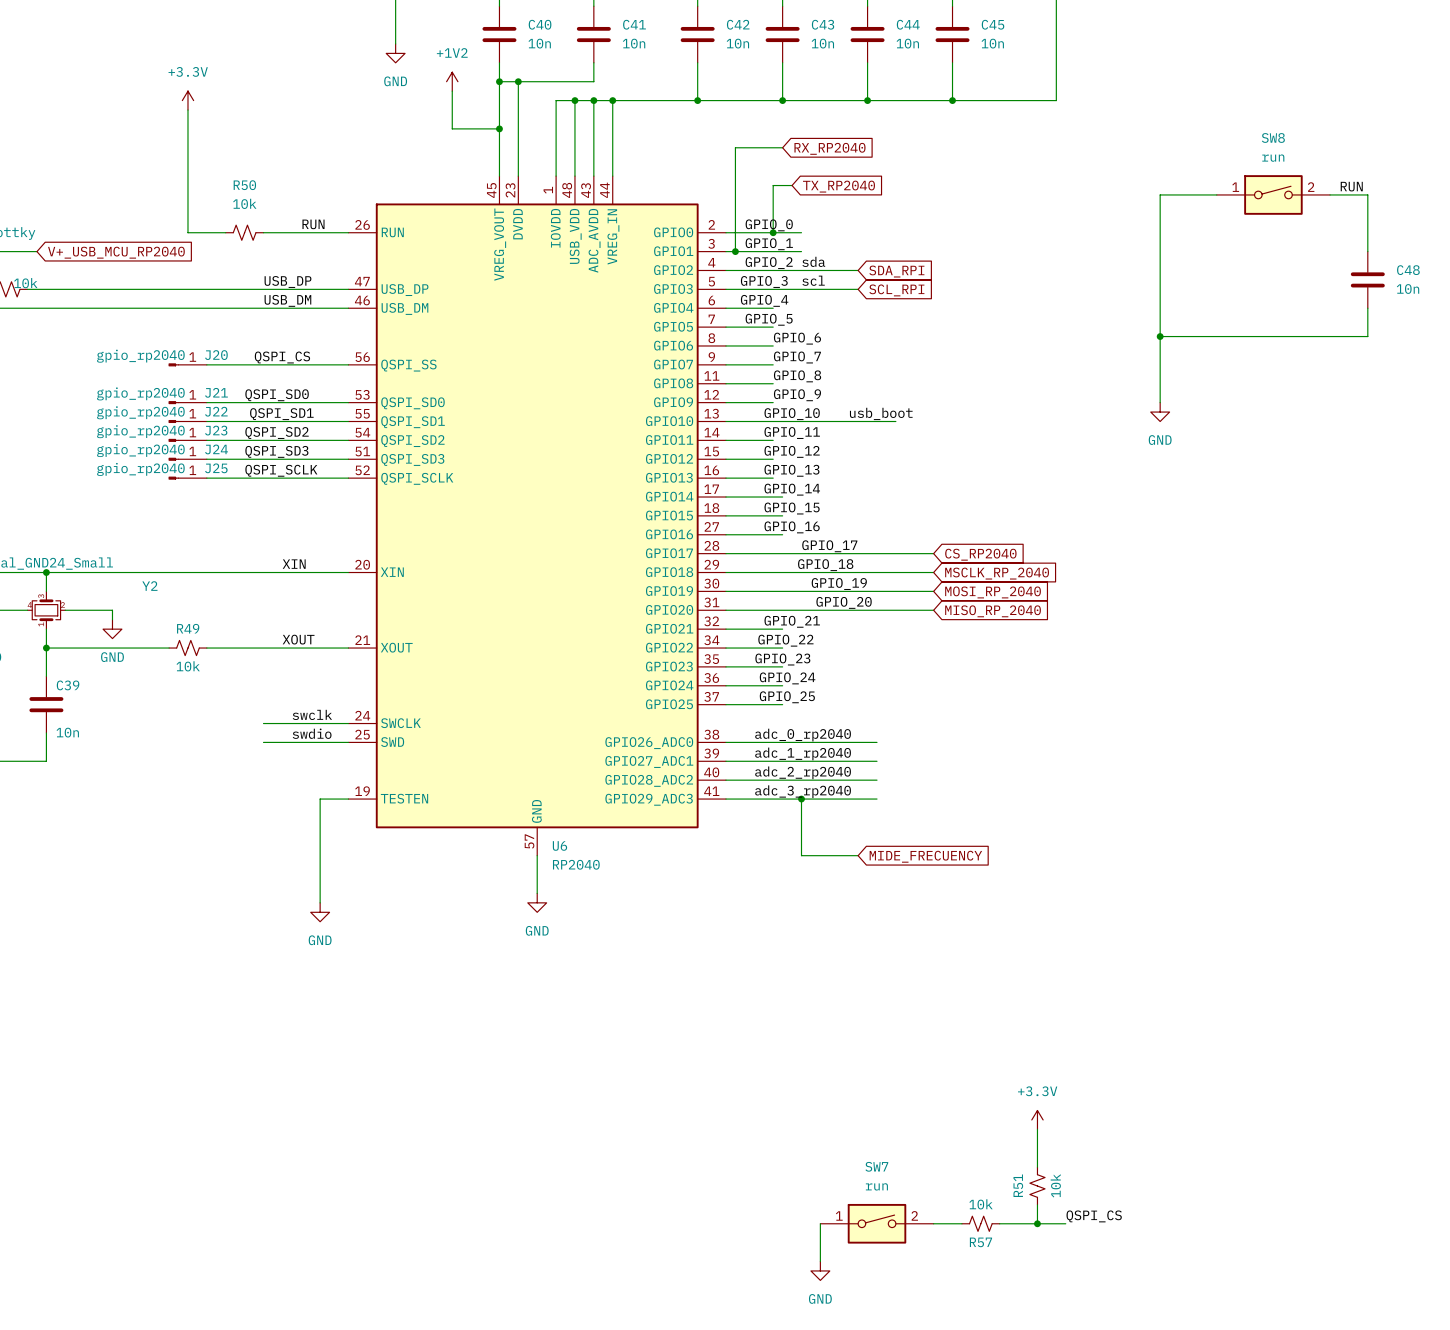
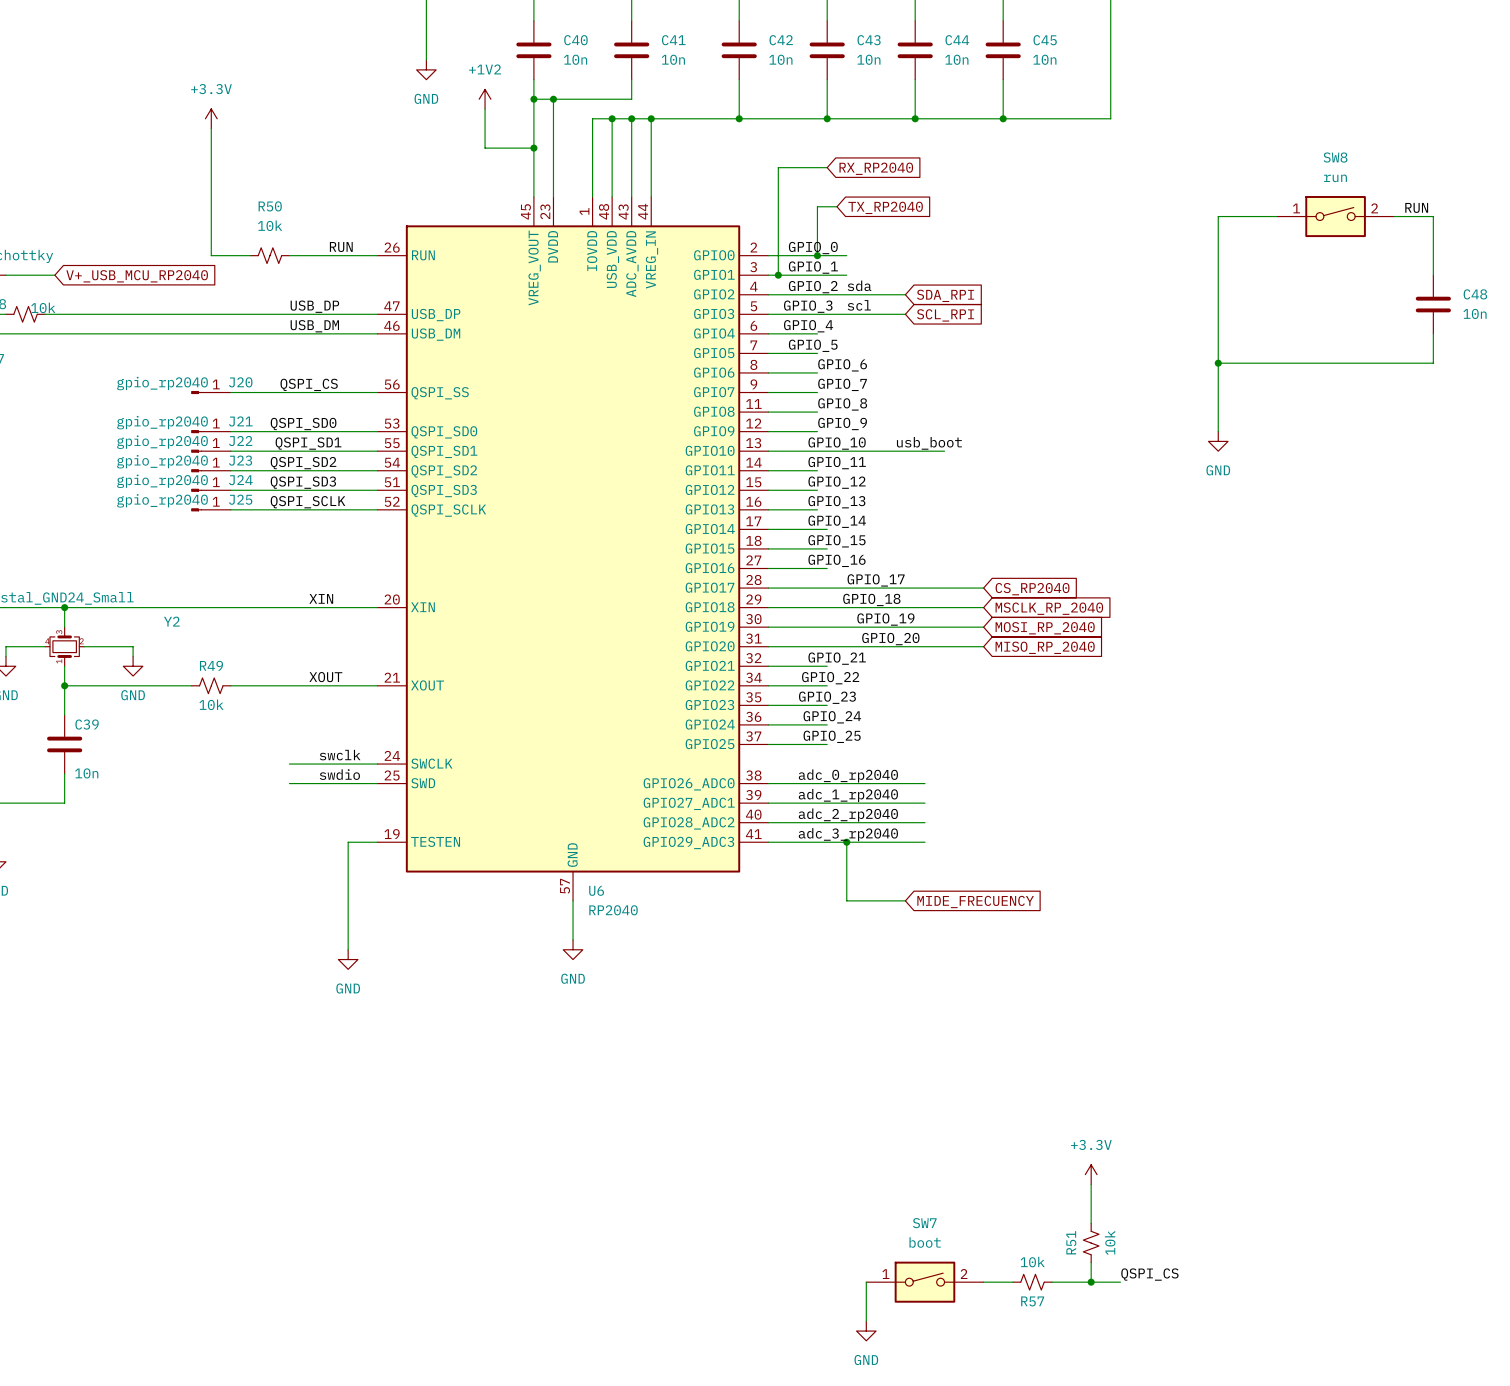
SW7 value: run (876, 1186) -> boot (925, 1242)

